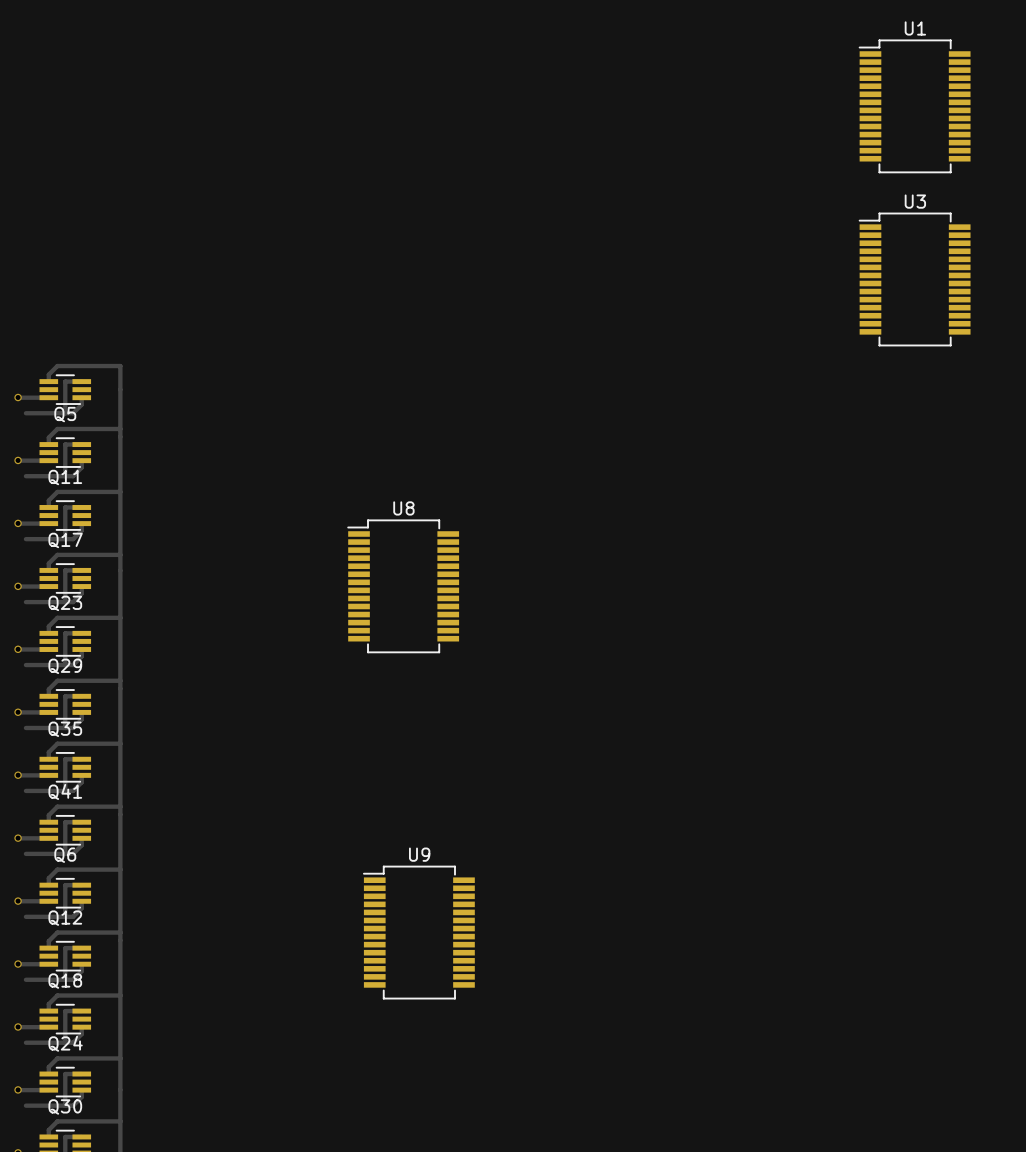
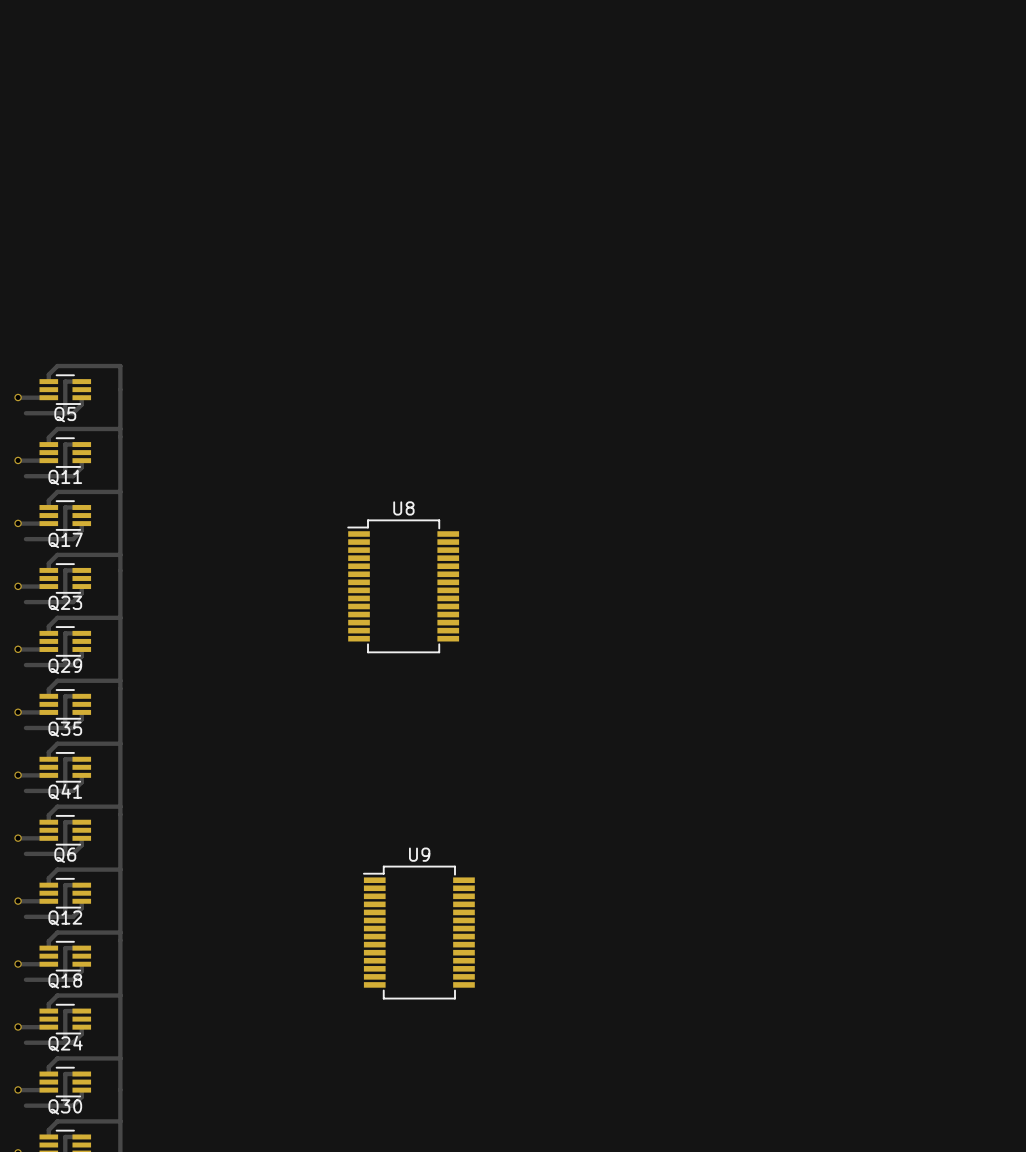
U1: (914, 106) -> none
U3: (914, 279) -> none

